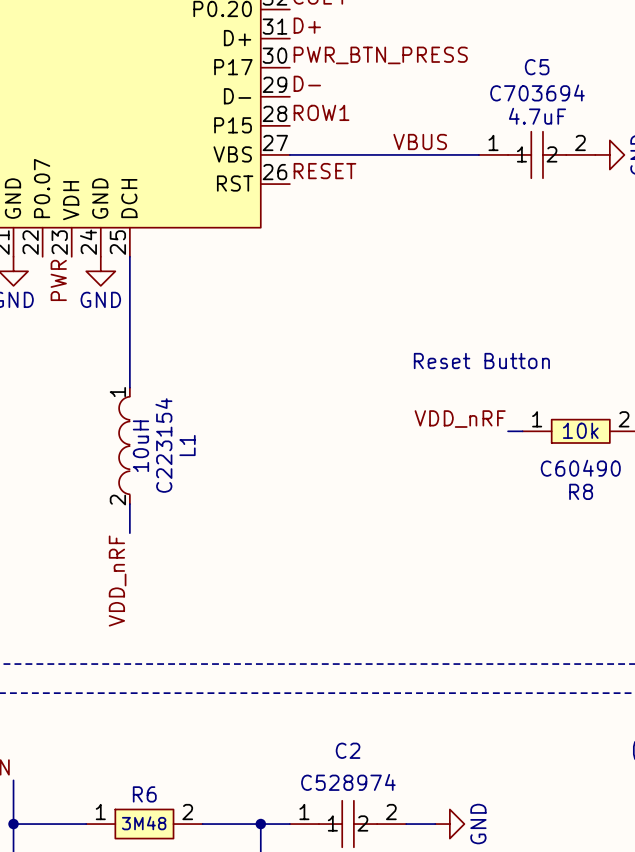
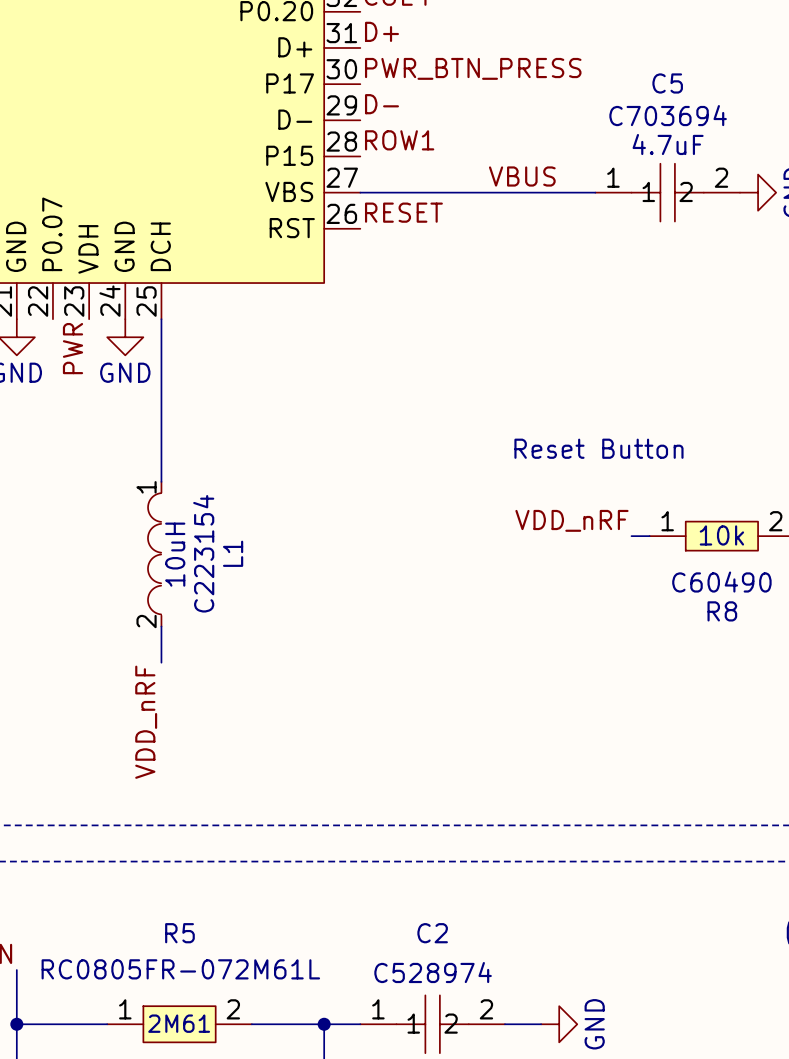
R6 value: none -> RC0805FR-072M61L (180, 969)
R6 name: R6 (144, 794) -> R5 (179, 933)
R6 text: 3M48 (144, 823) -> 2M61 (179, 1023)

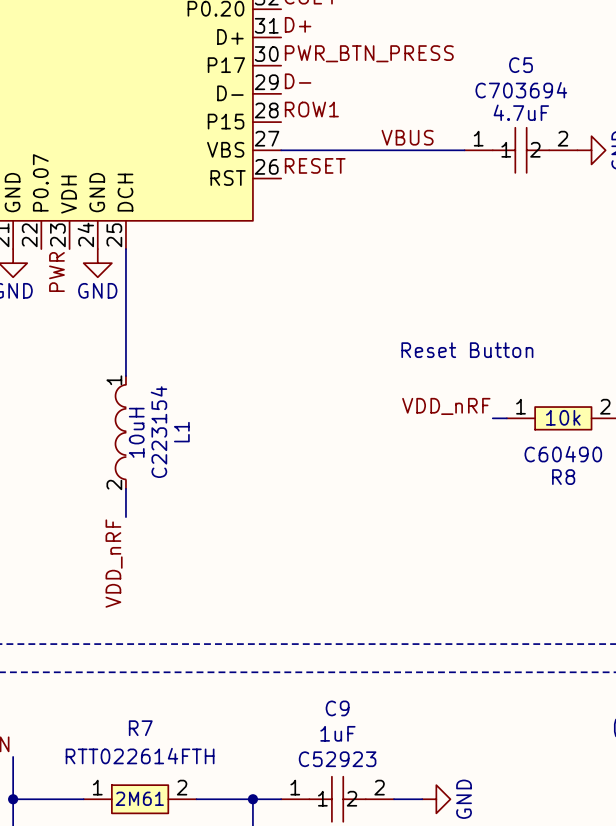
R5 name: R5 (179, 933) -> R7 (140, 728)
C2 name: C2 (432, 933) -> C9 (337, 708)
C2 text: none -> 1uF (337, 733)
R5 value: RC0805FR-072M61L (180, 969) -> RTT022614FTH (140, 756)
C2 text: C528974 (433, 972) -> C52923 (337, 759)

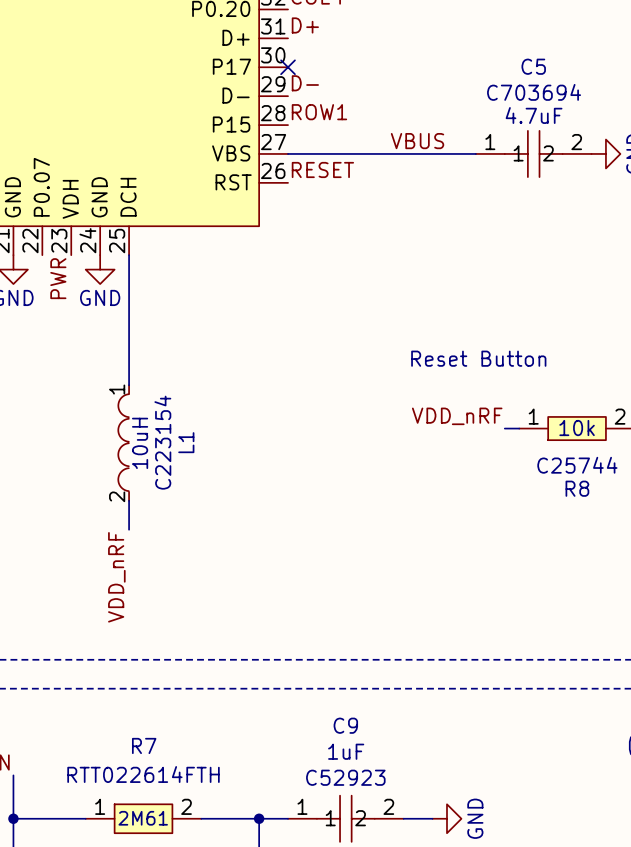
label: PWR_BTN_PRESS (369, 53) -> none
no-connect mark: none -> (288, 67)
R8 text: C60490 (563, 454) -> C25744 (577, 465)

